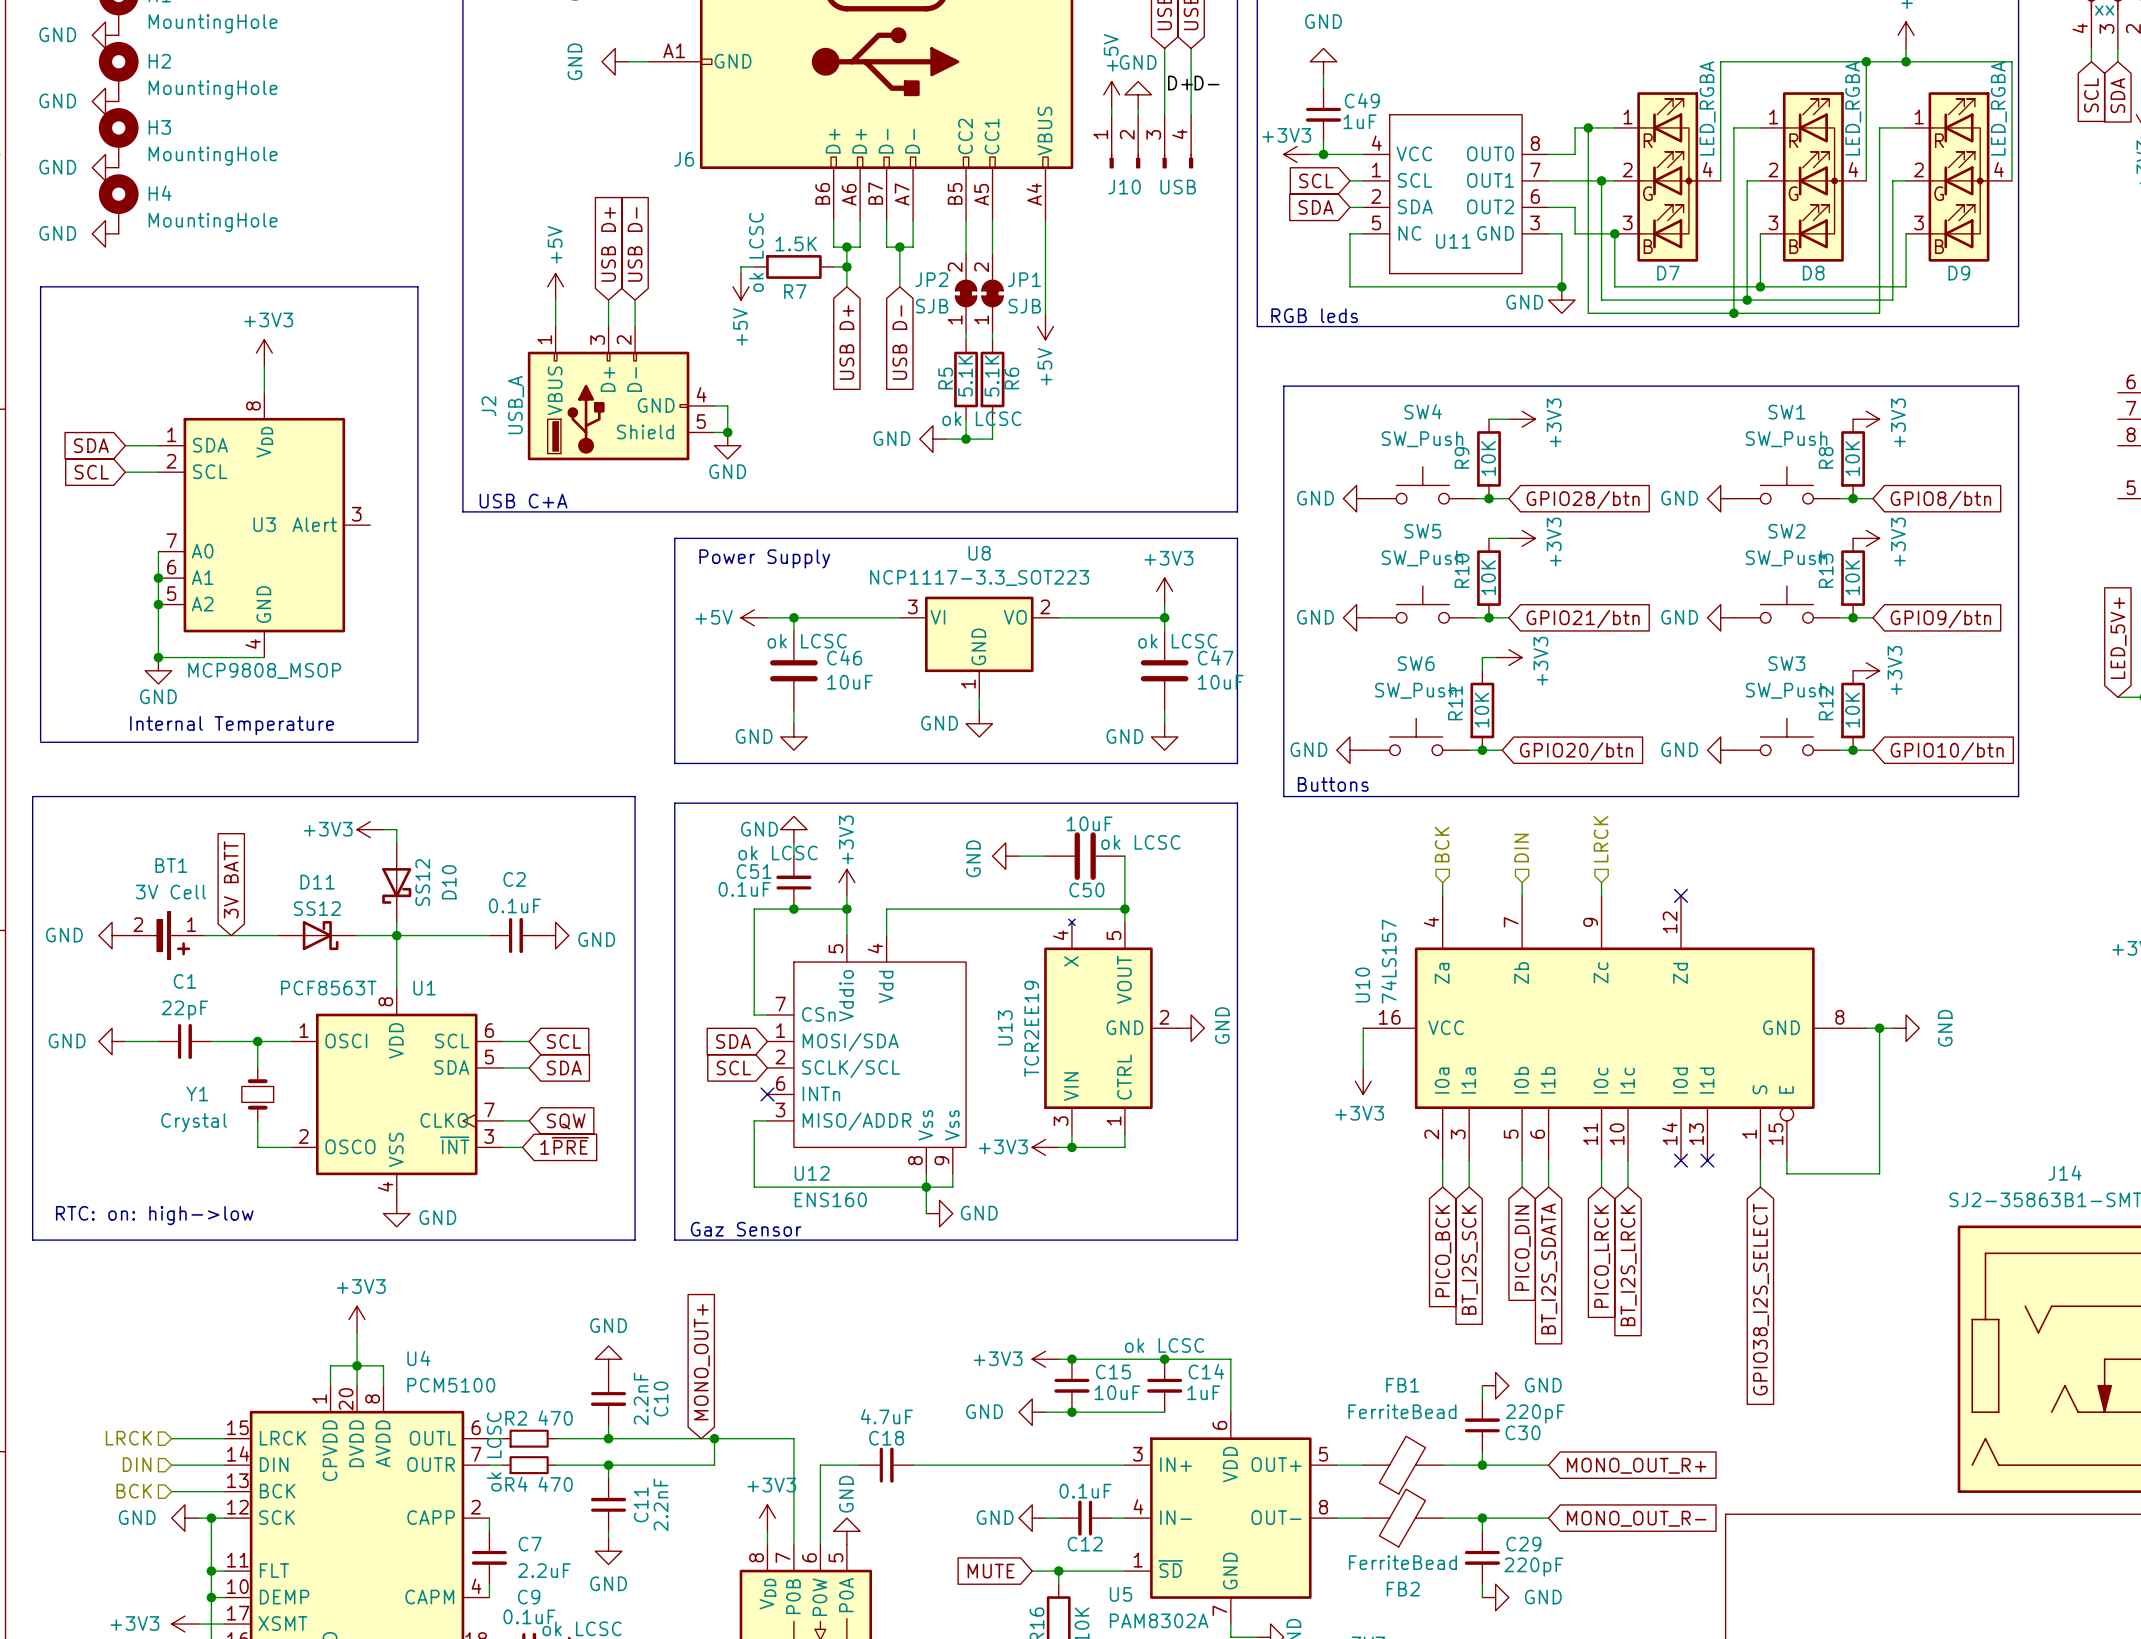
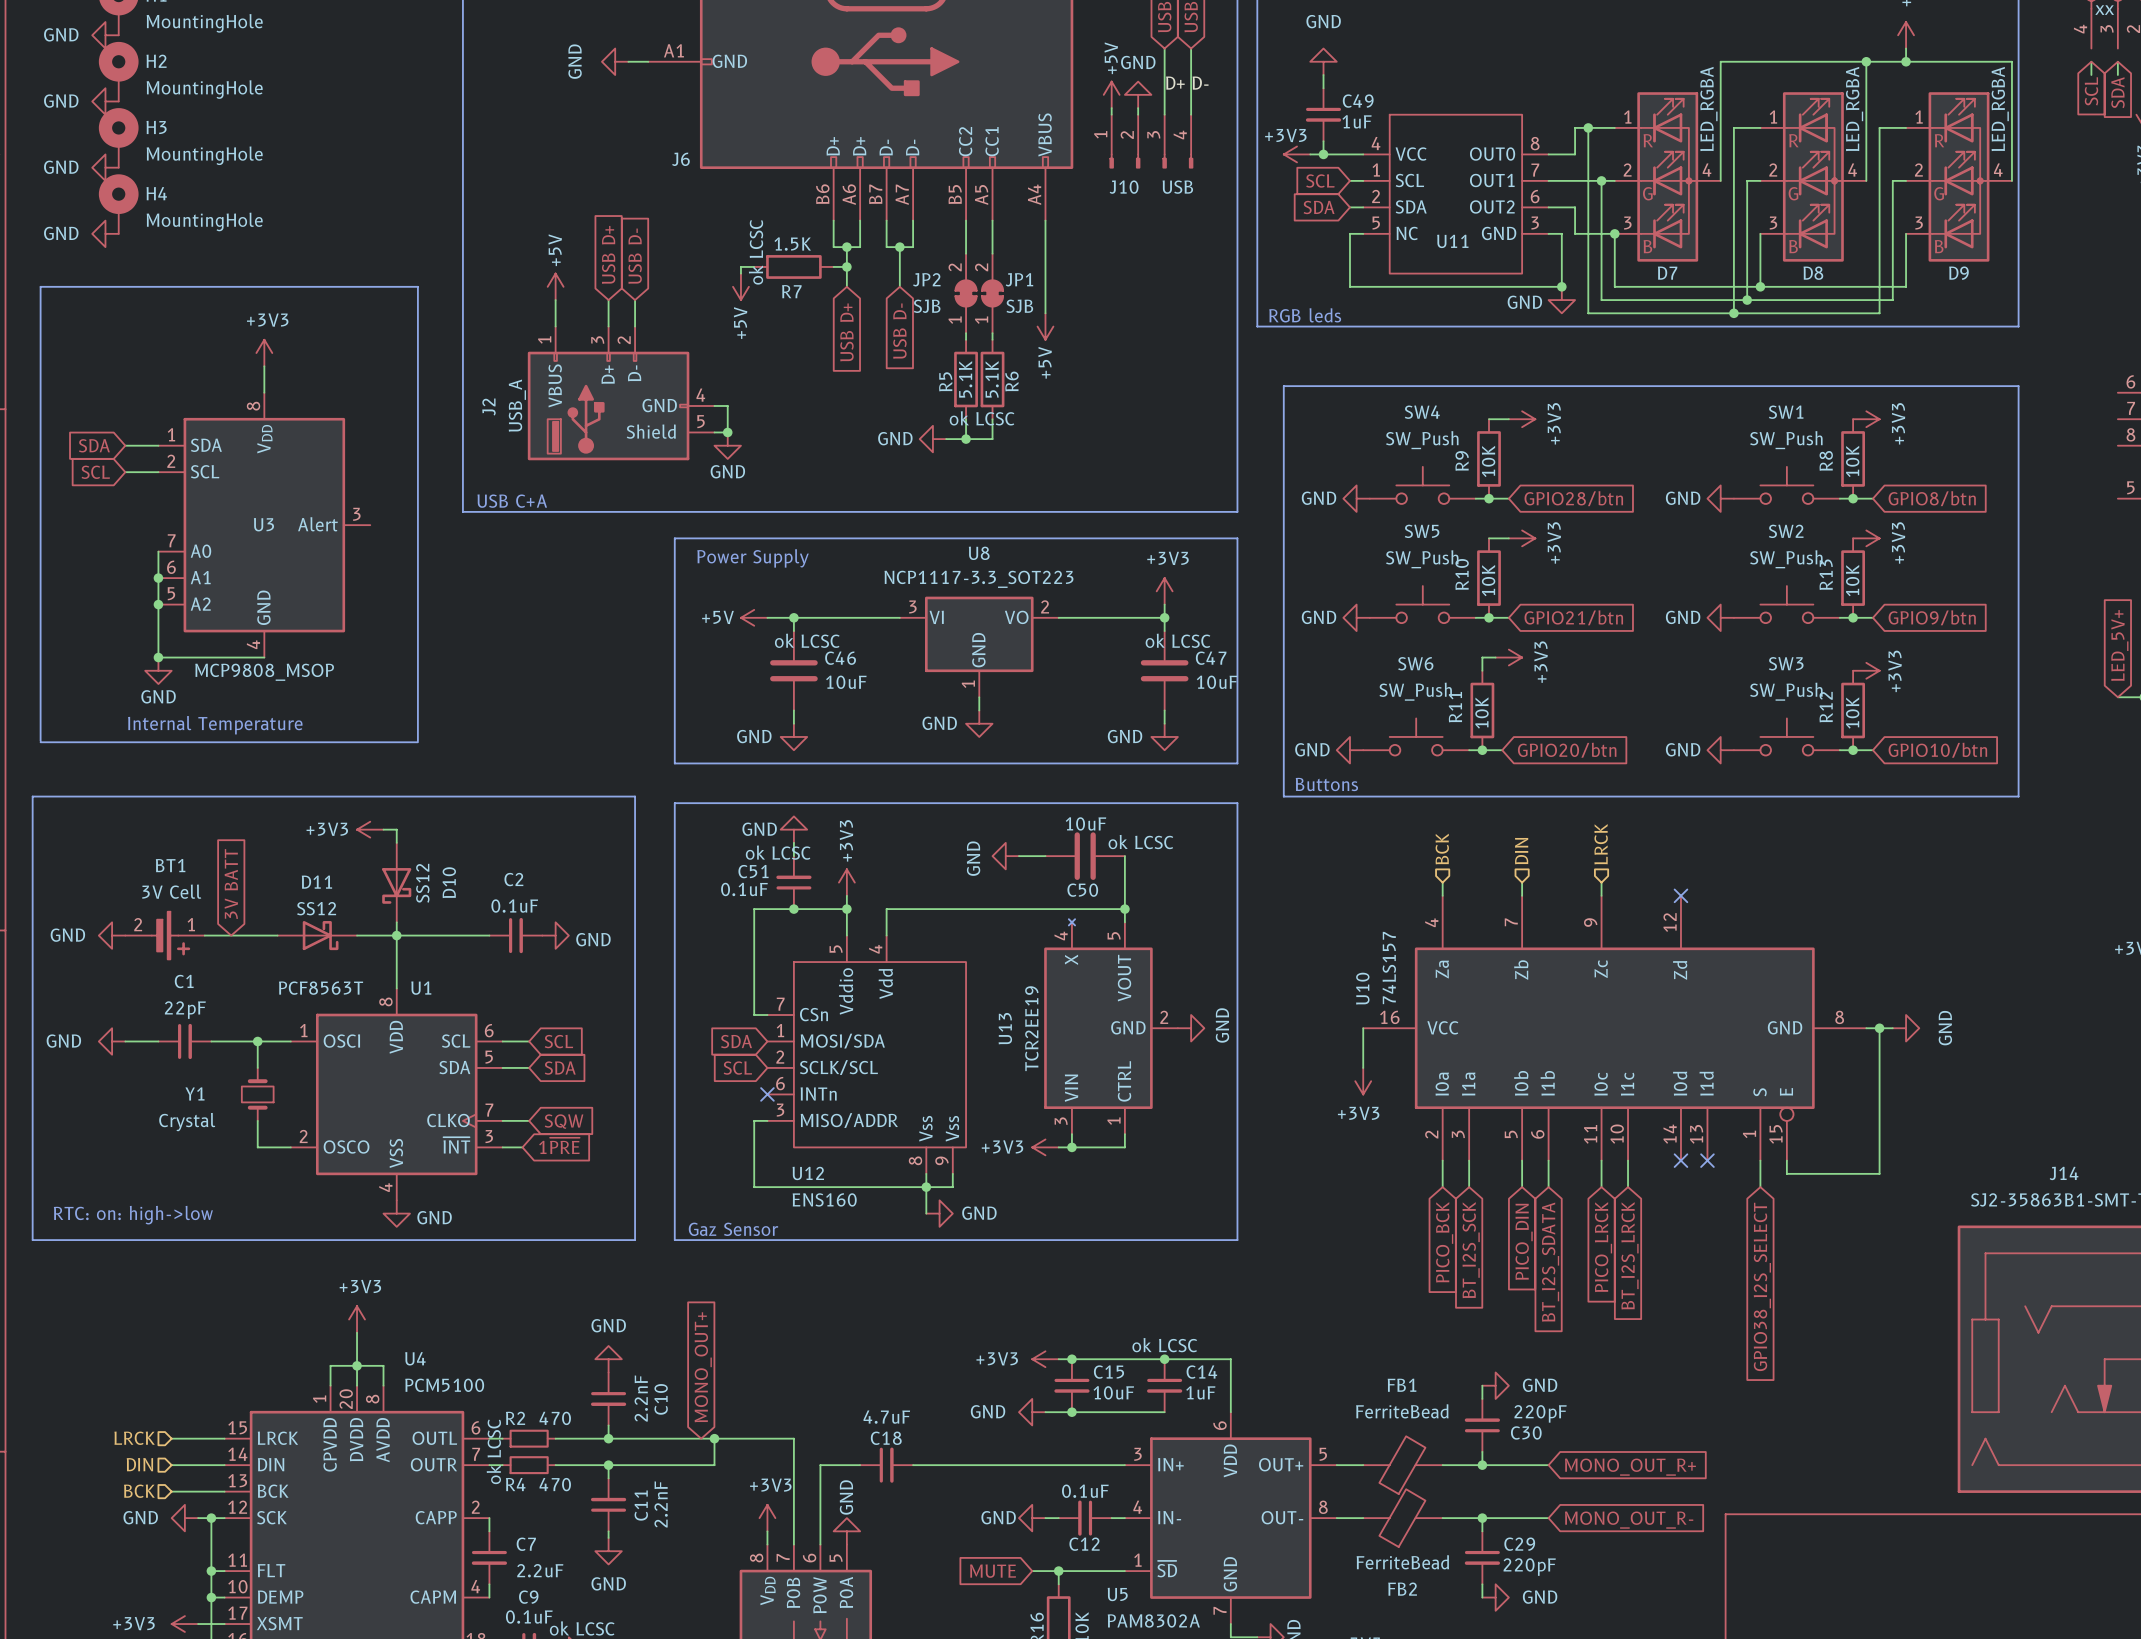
wire: (2091, 48) (2091, 61) -> (2091, 75) (2091, 61)
wire: (2117, 48) (2117, 61) -> (2117, 75) (2117, 61)

